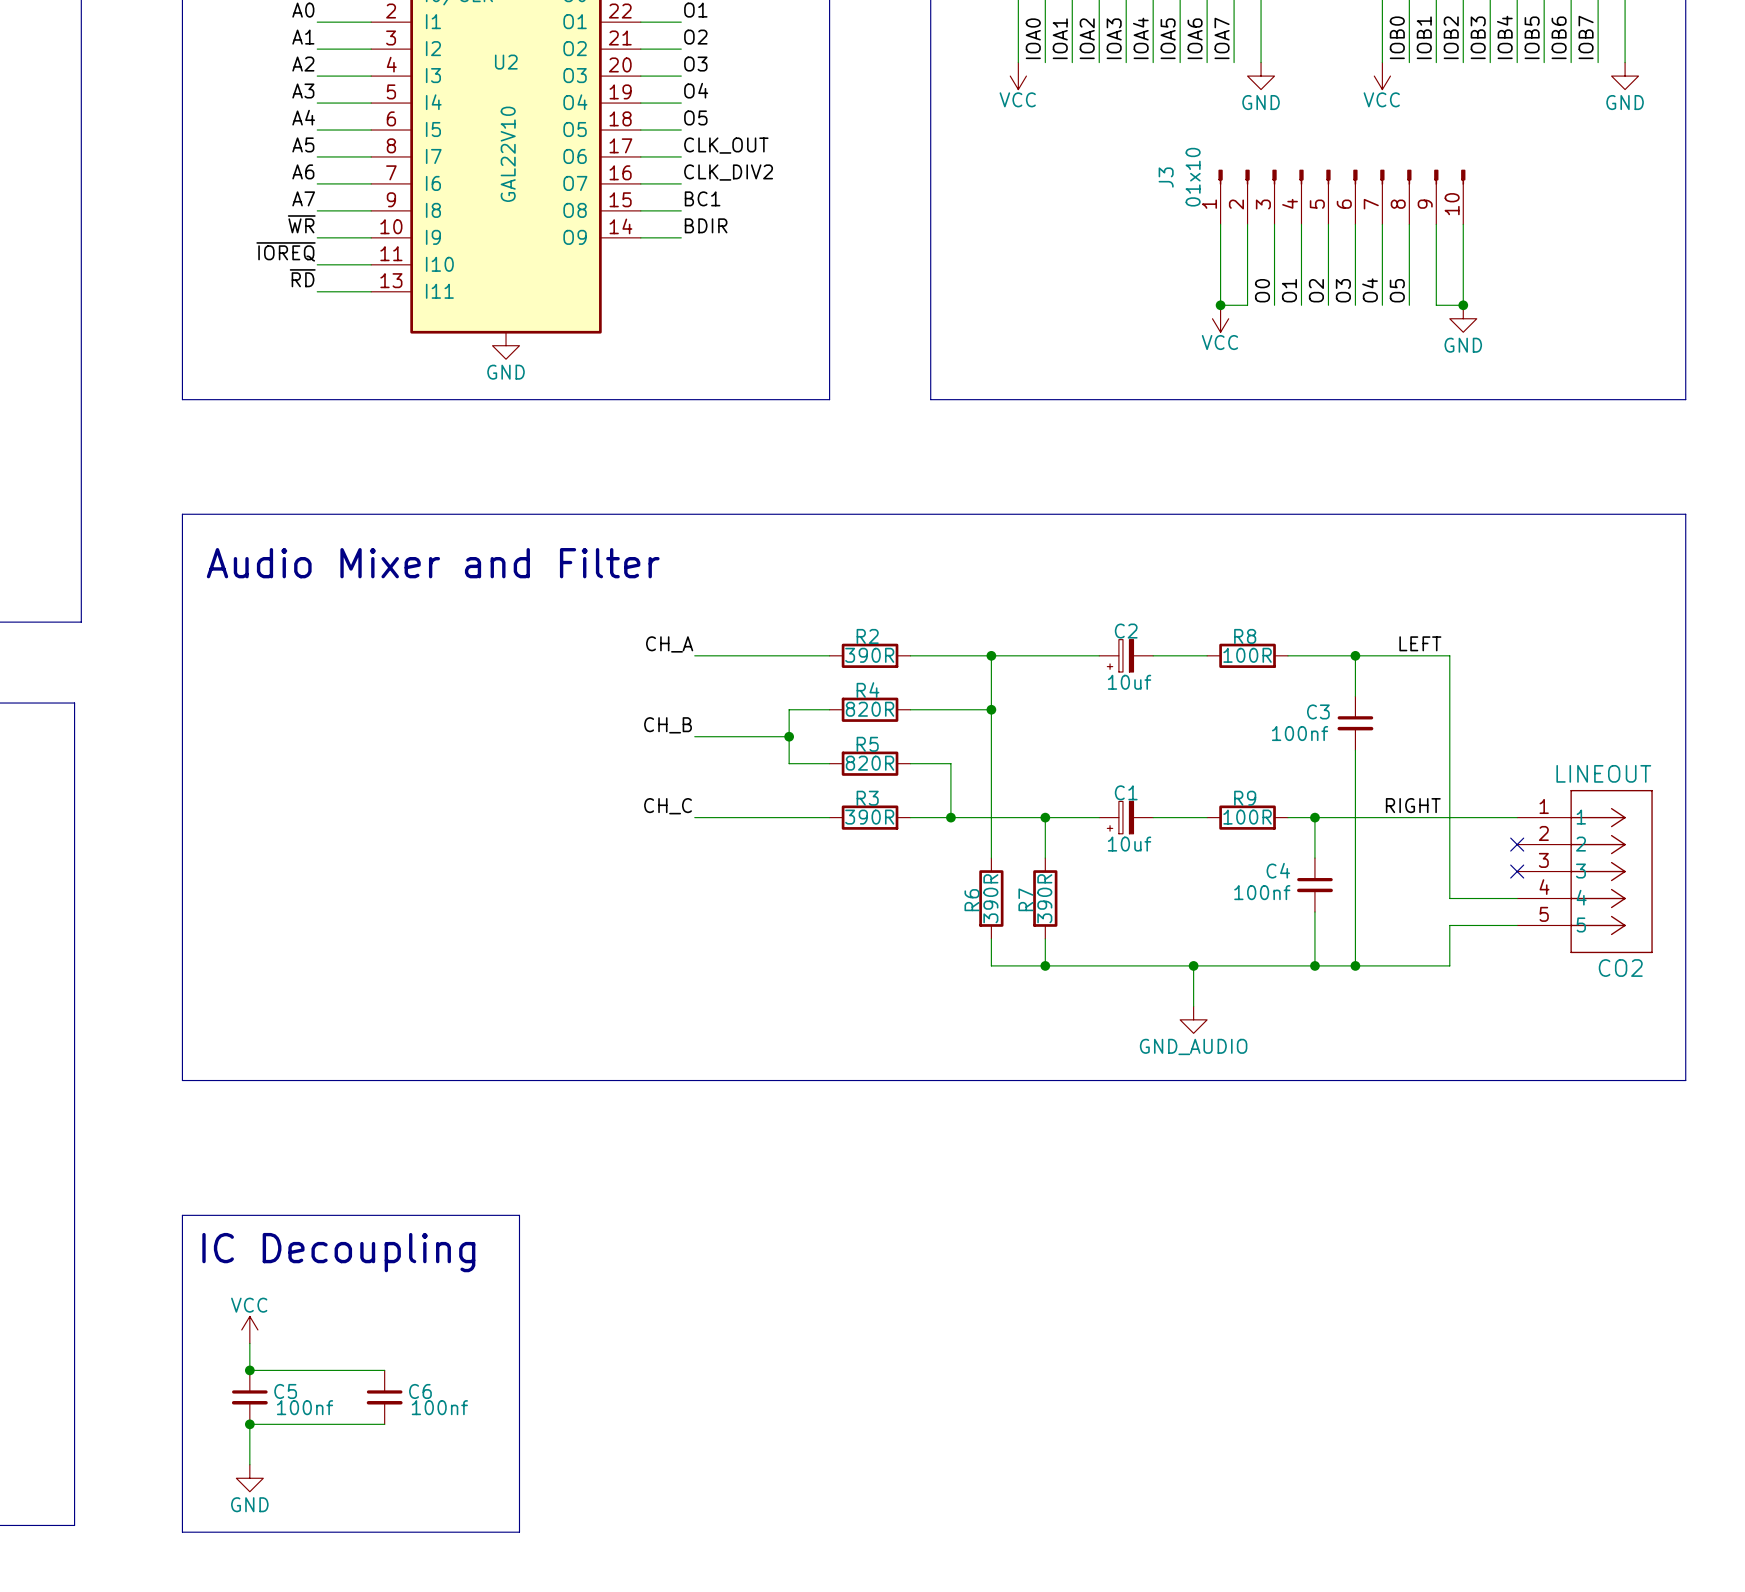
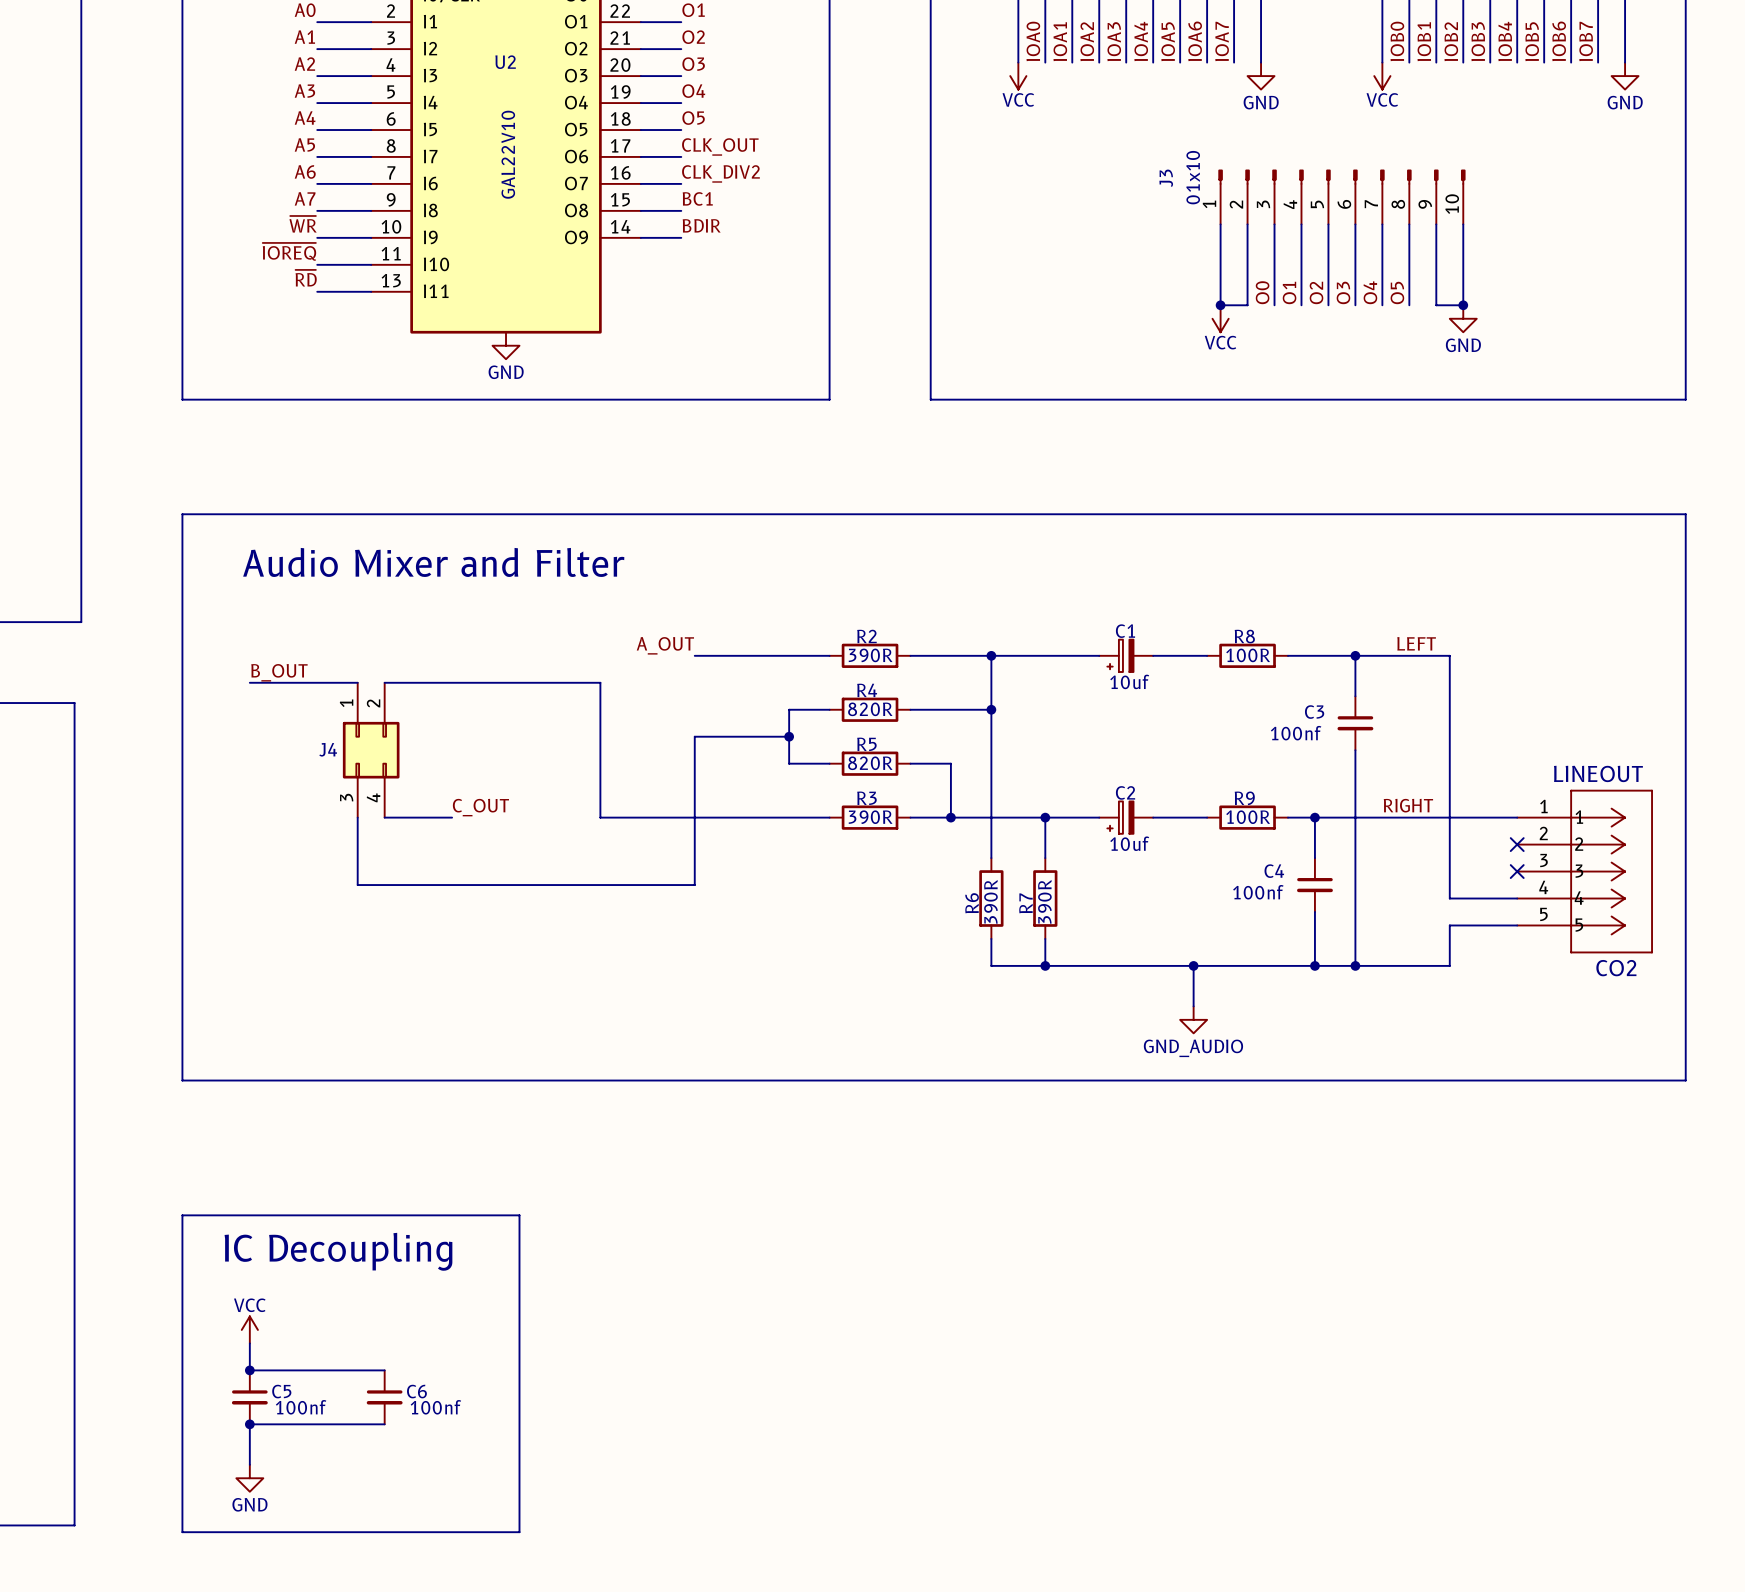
C2 name: C2 (1126, 631) -> C1 (1125, 631)
label: CH_A (669, 644) -> A_OUT (665, 645)
label: none -> B_OUT (279, 672)
wire: none -> (249, 682) (357, 682)
wire: none -> (384, 682) (600, 682) (600, 817) (694, 817)
label: CH_B (668, 725) -> none
wire: none -> (694, 736) (694, 885) (357, 885) (357, 817)
J4: none -> (371, 750)
C1 name: C1 (1126, 792) -> C2 (1125, 792)
label: none -> C_OUT (480, 807)
label: CH_C (668, 806) -> none
wire: none -> (384, 817) (452, 817)

